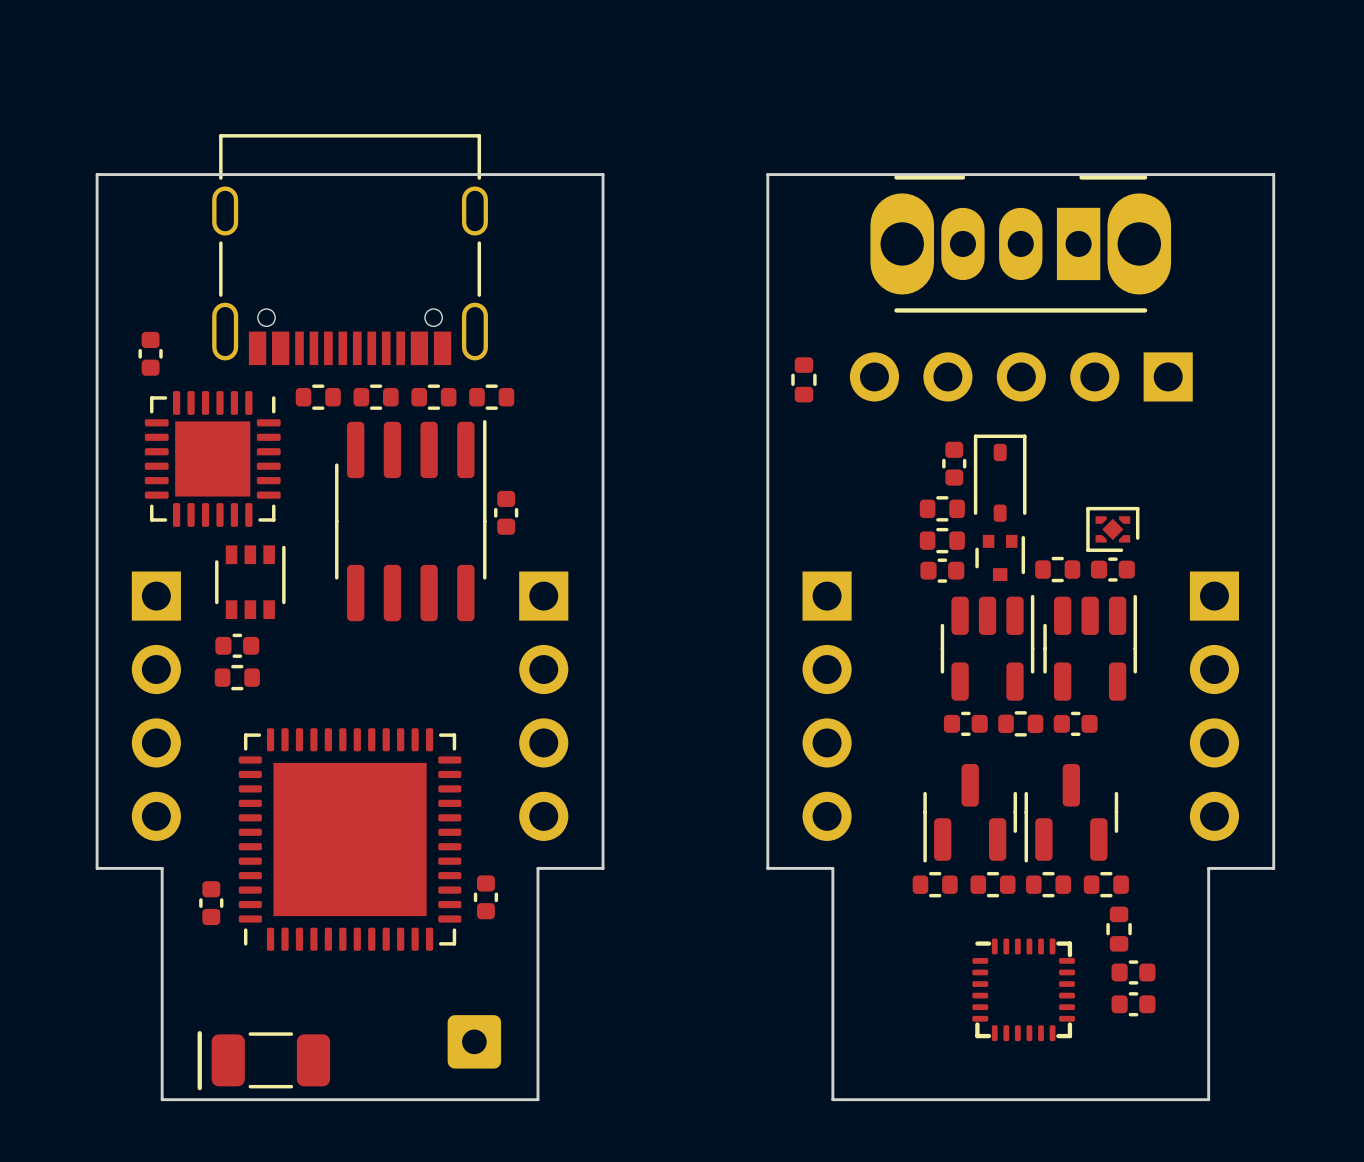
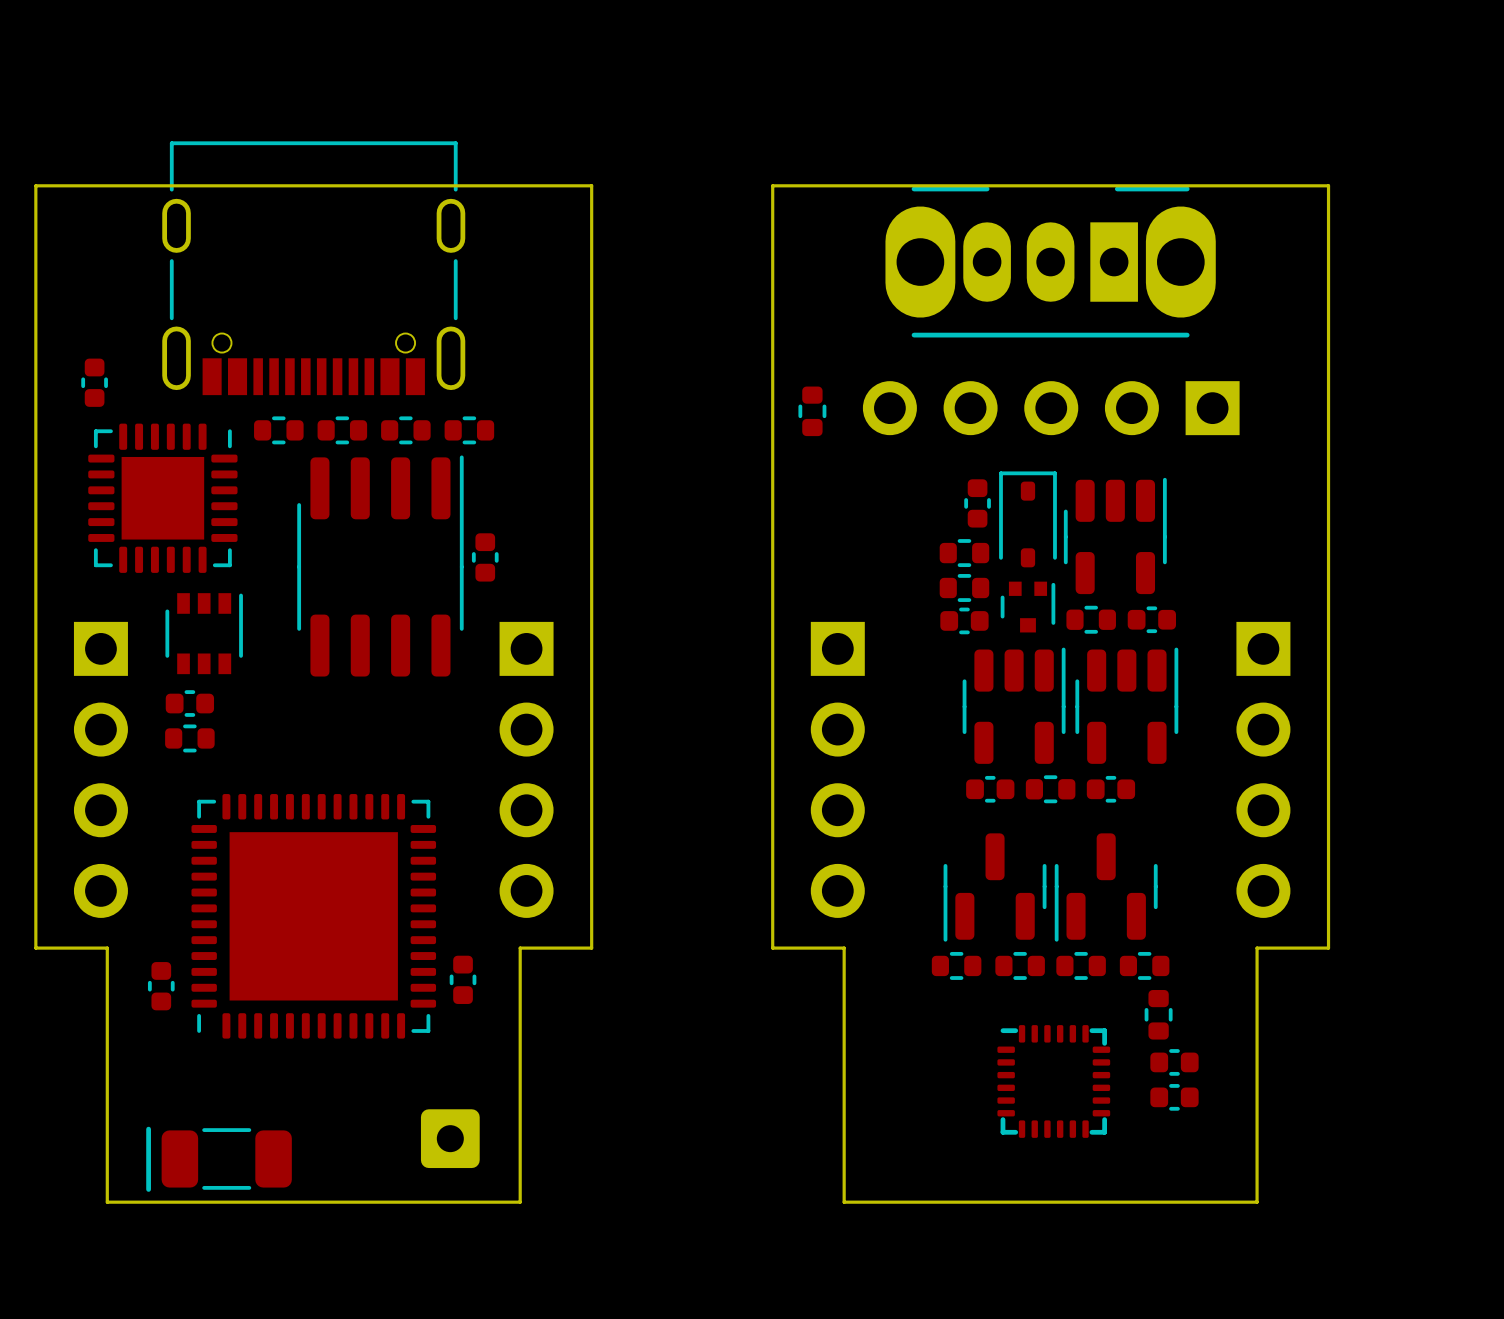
part: none -> (1115, 535)
part: (1112, 529) -> none

